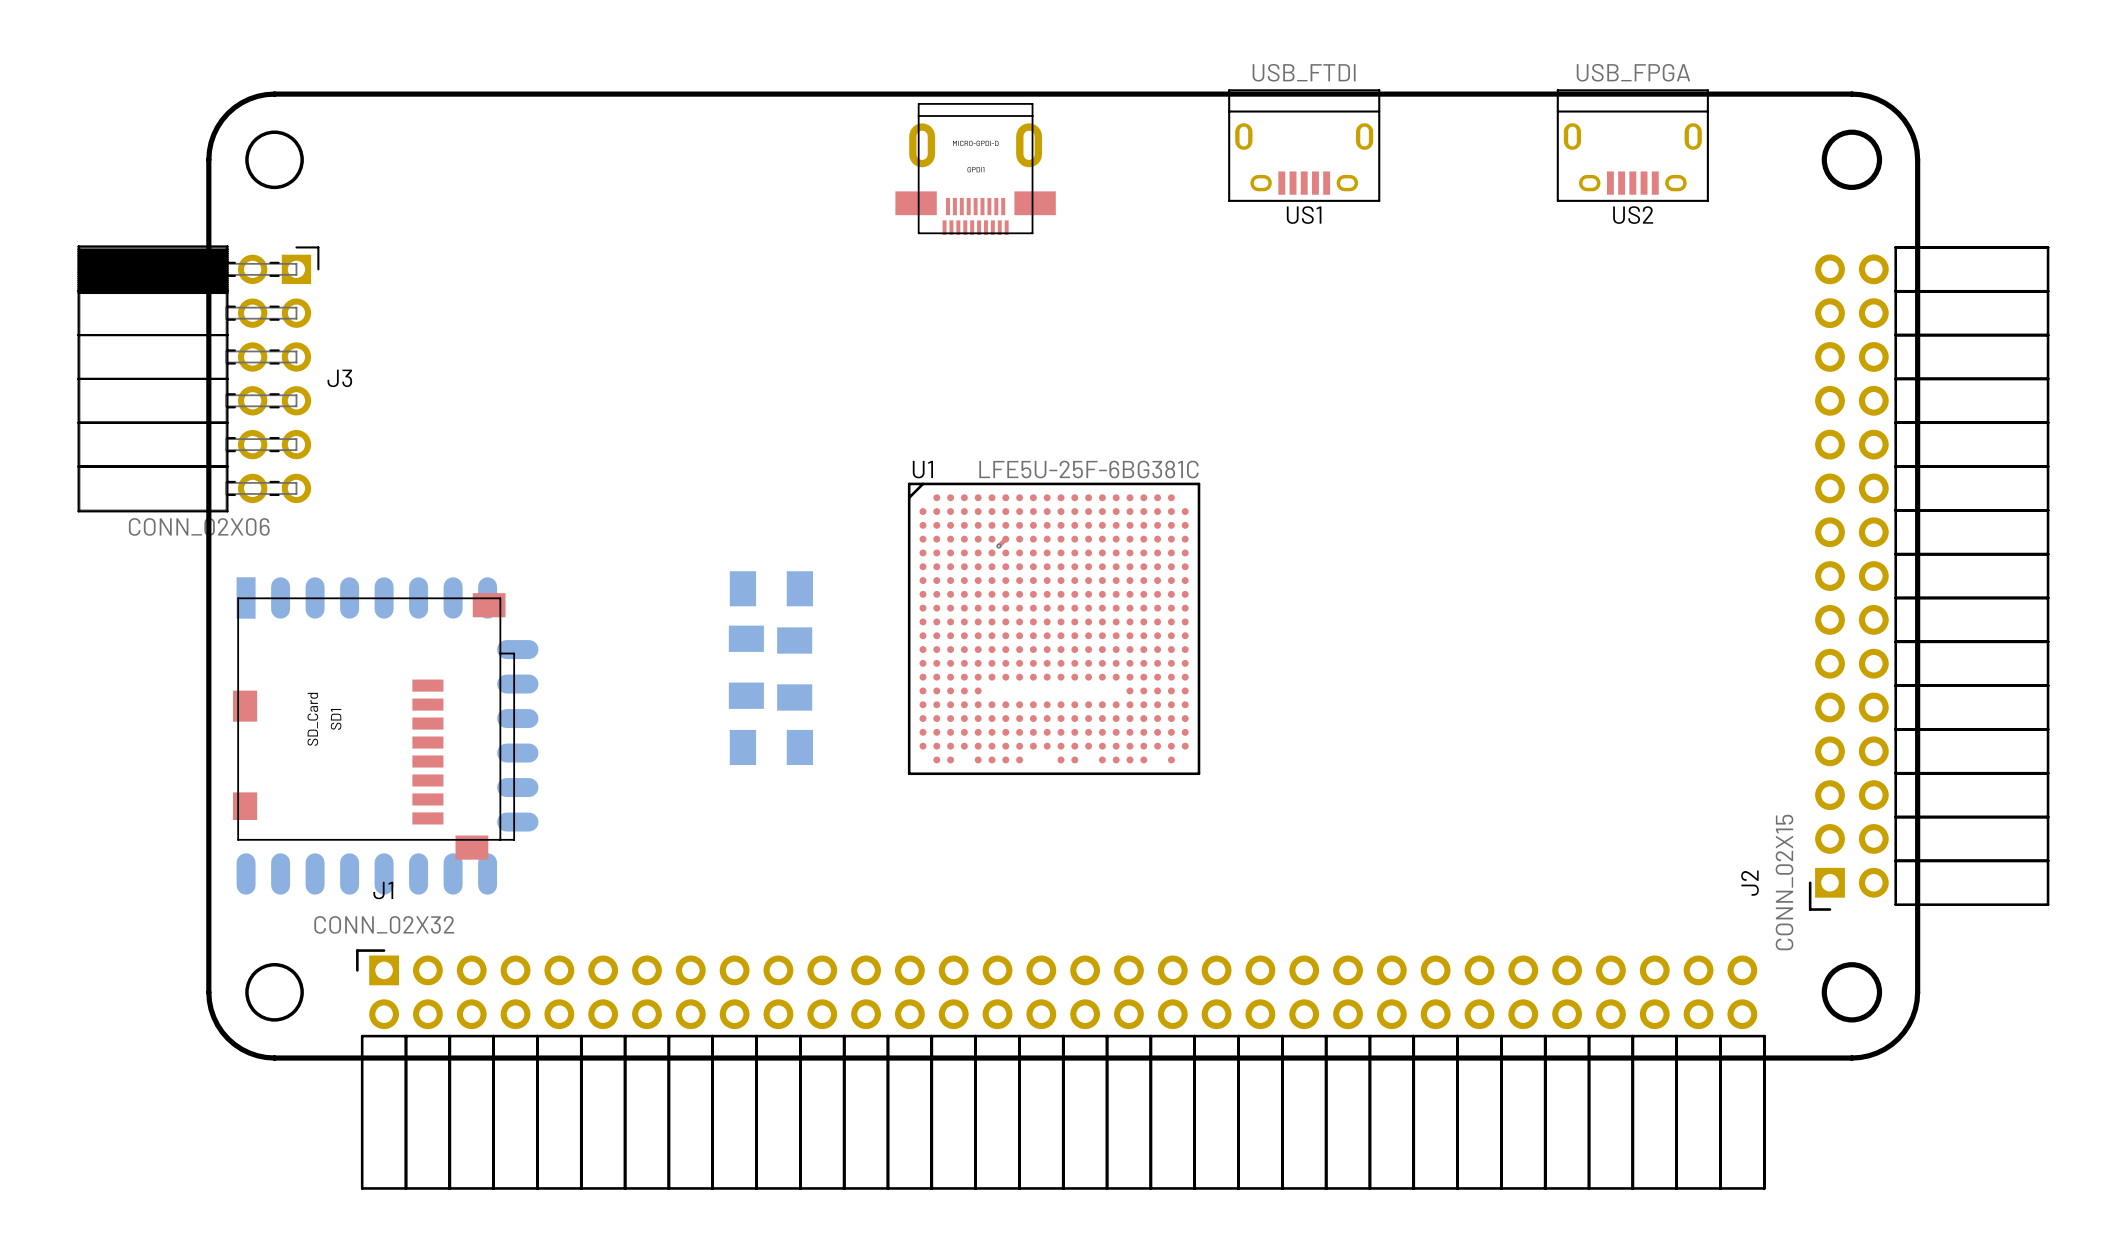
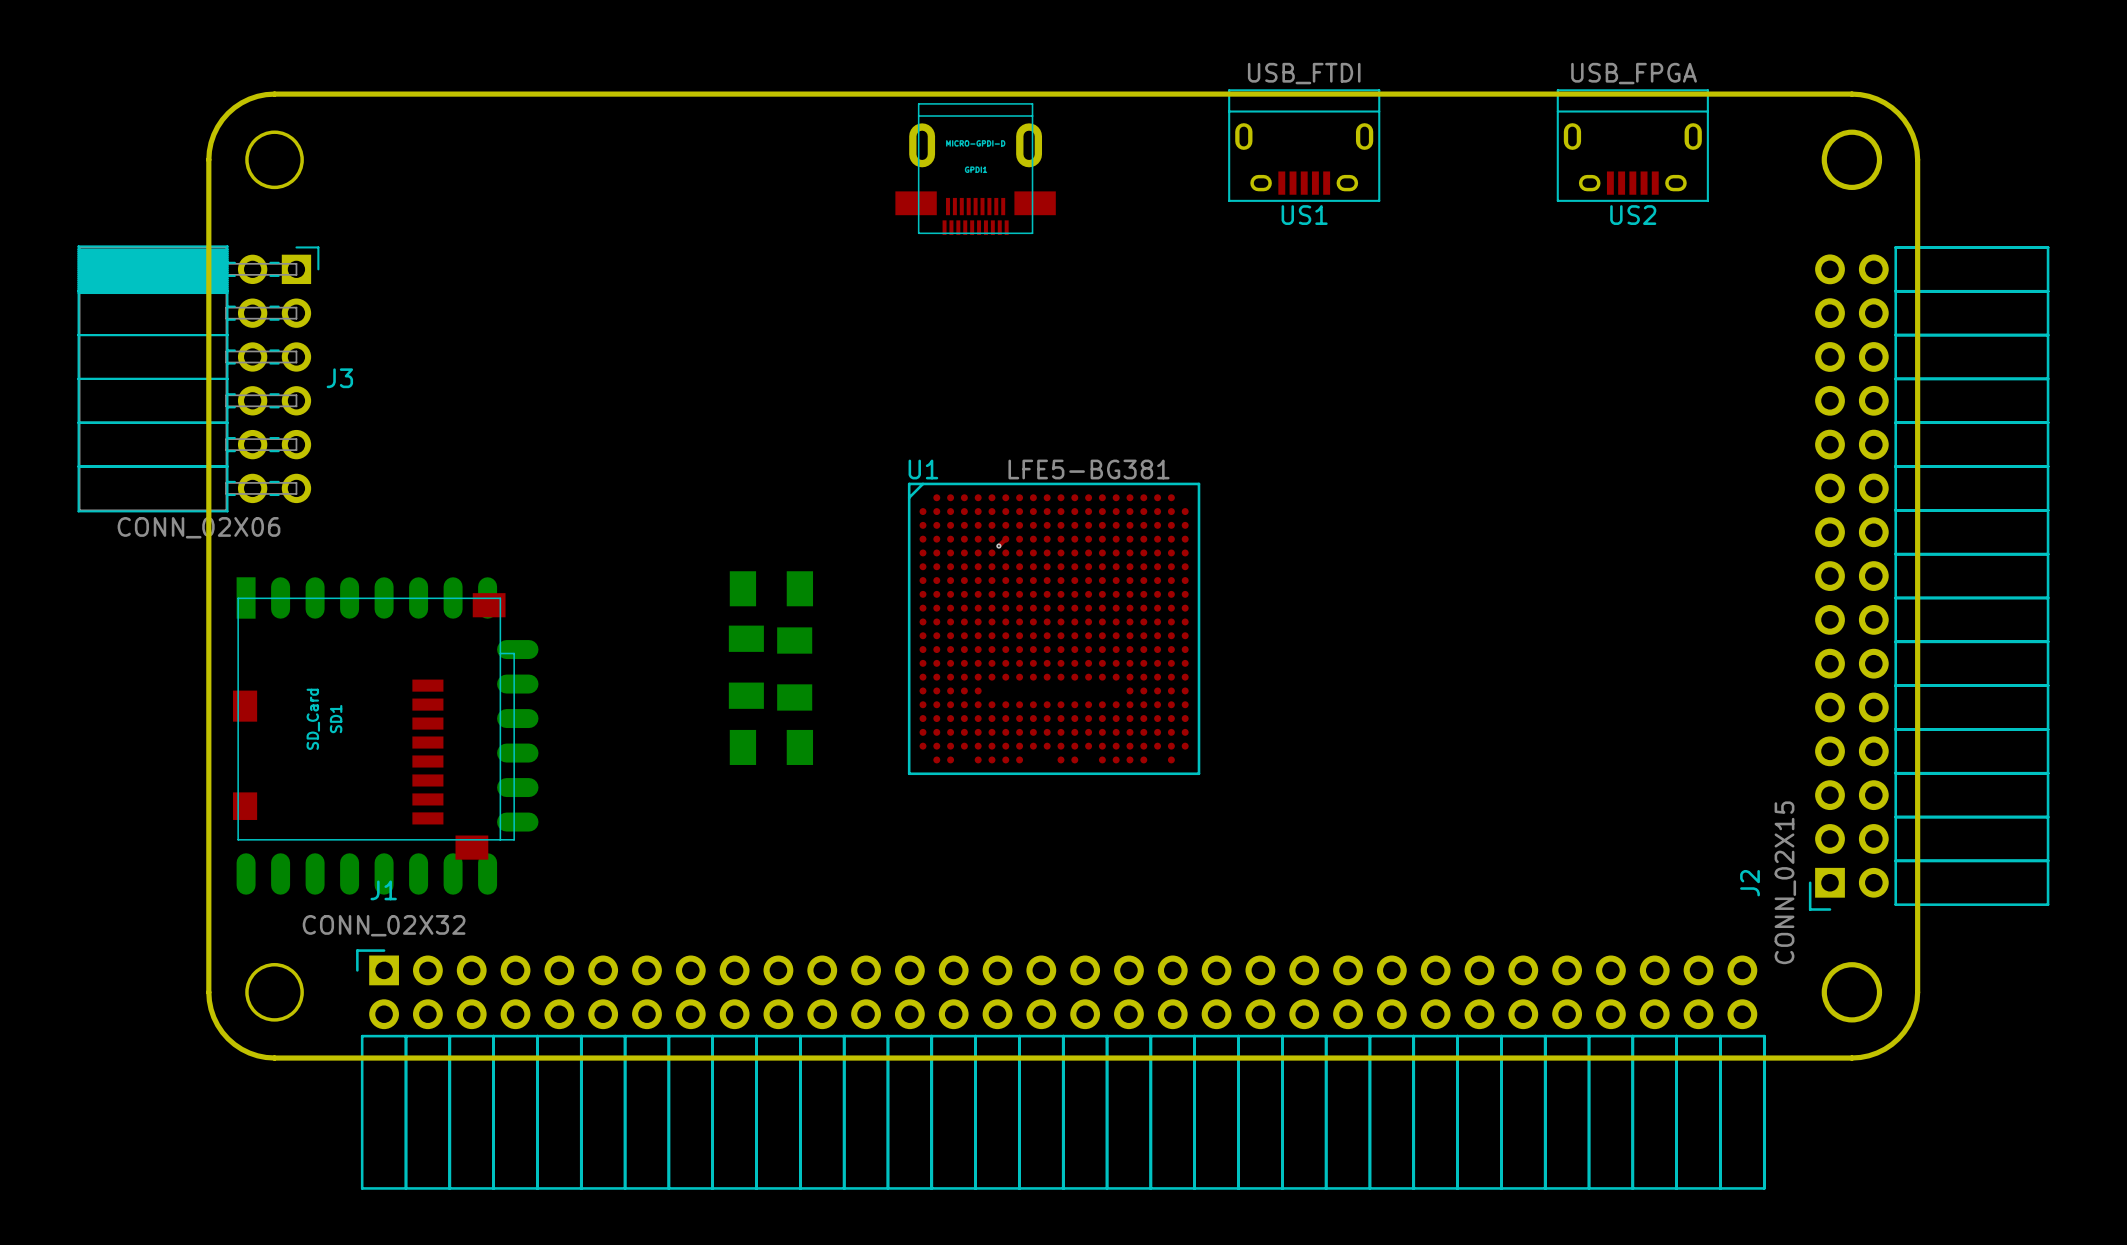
U1 value: LFE5U-25F-6BG381C (1088, 469) -> LFE5-BG381 (1089, 469)

